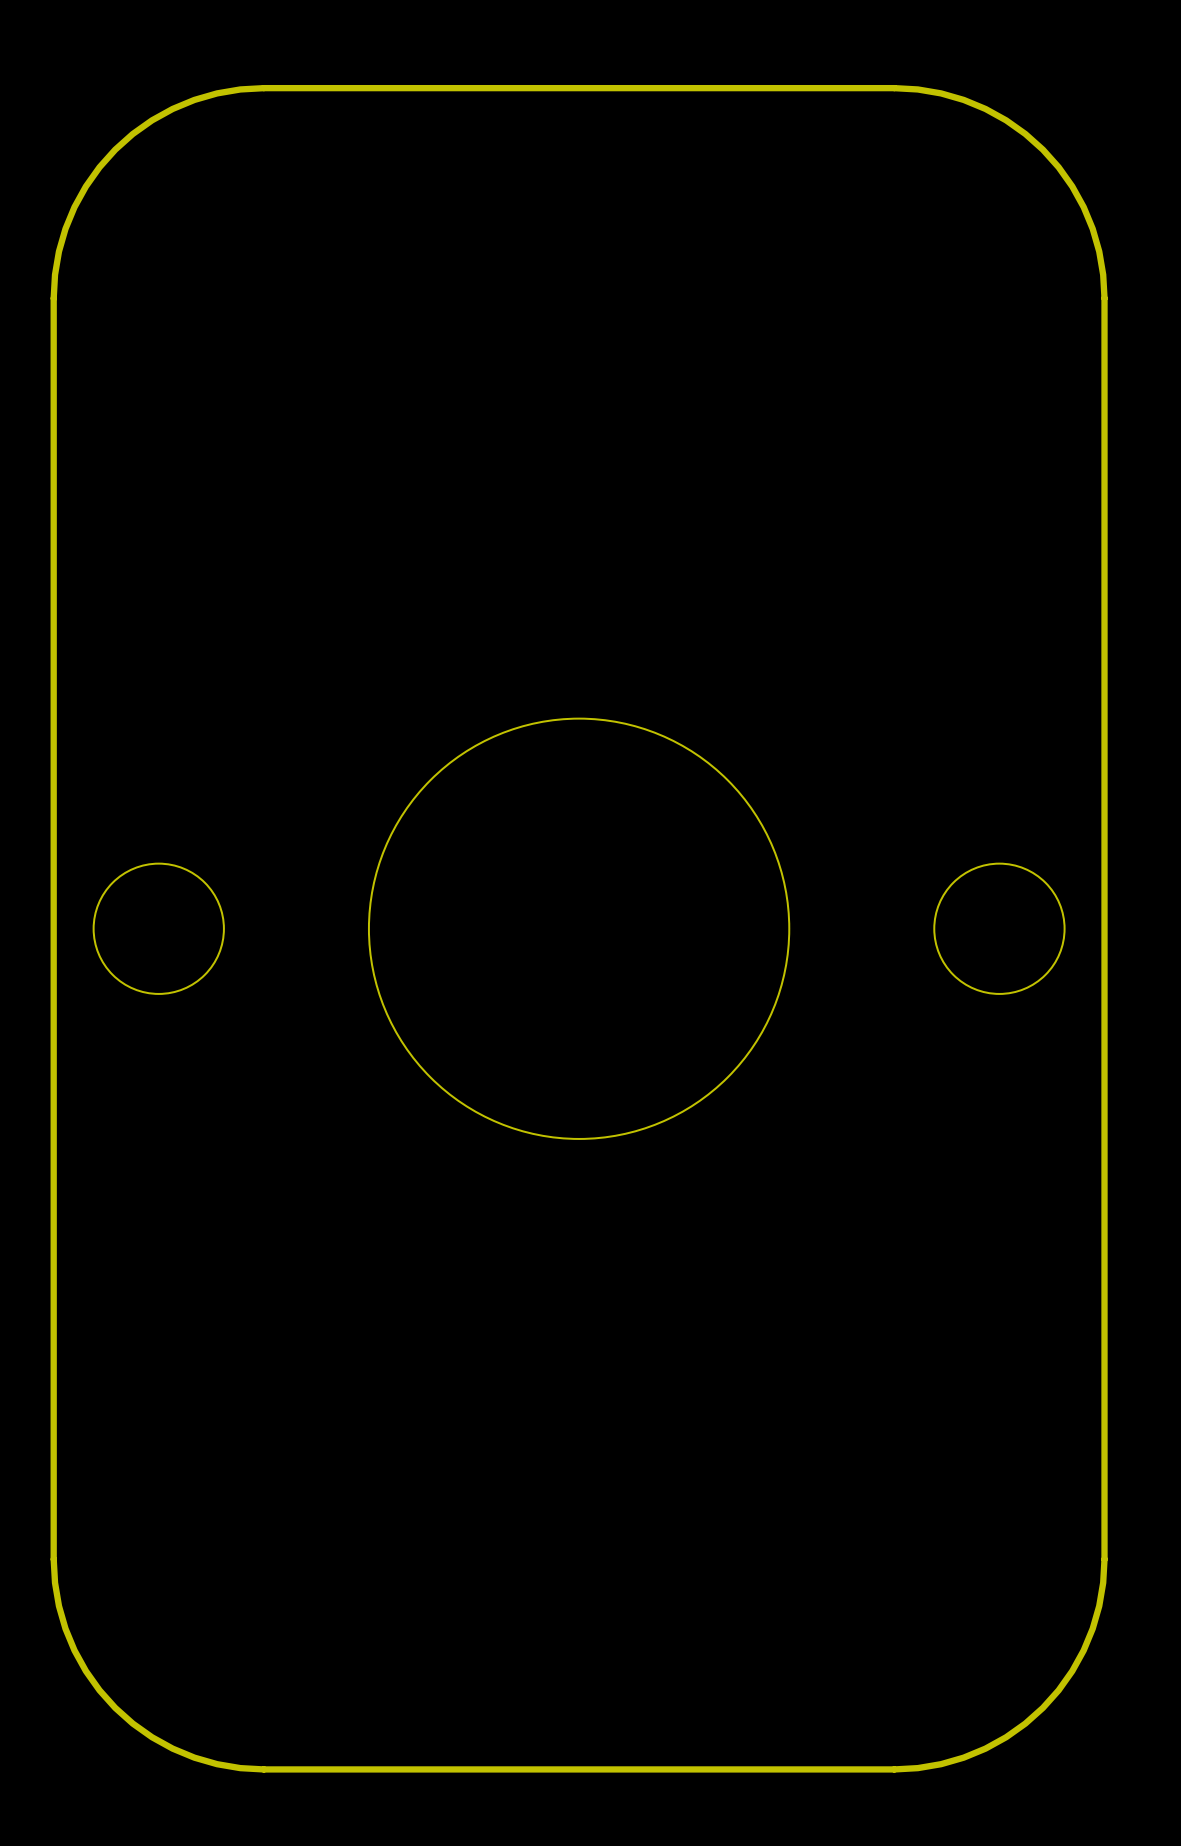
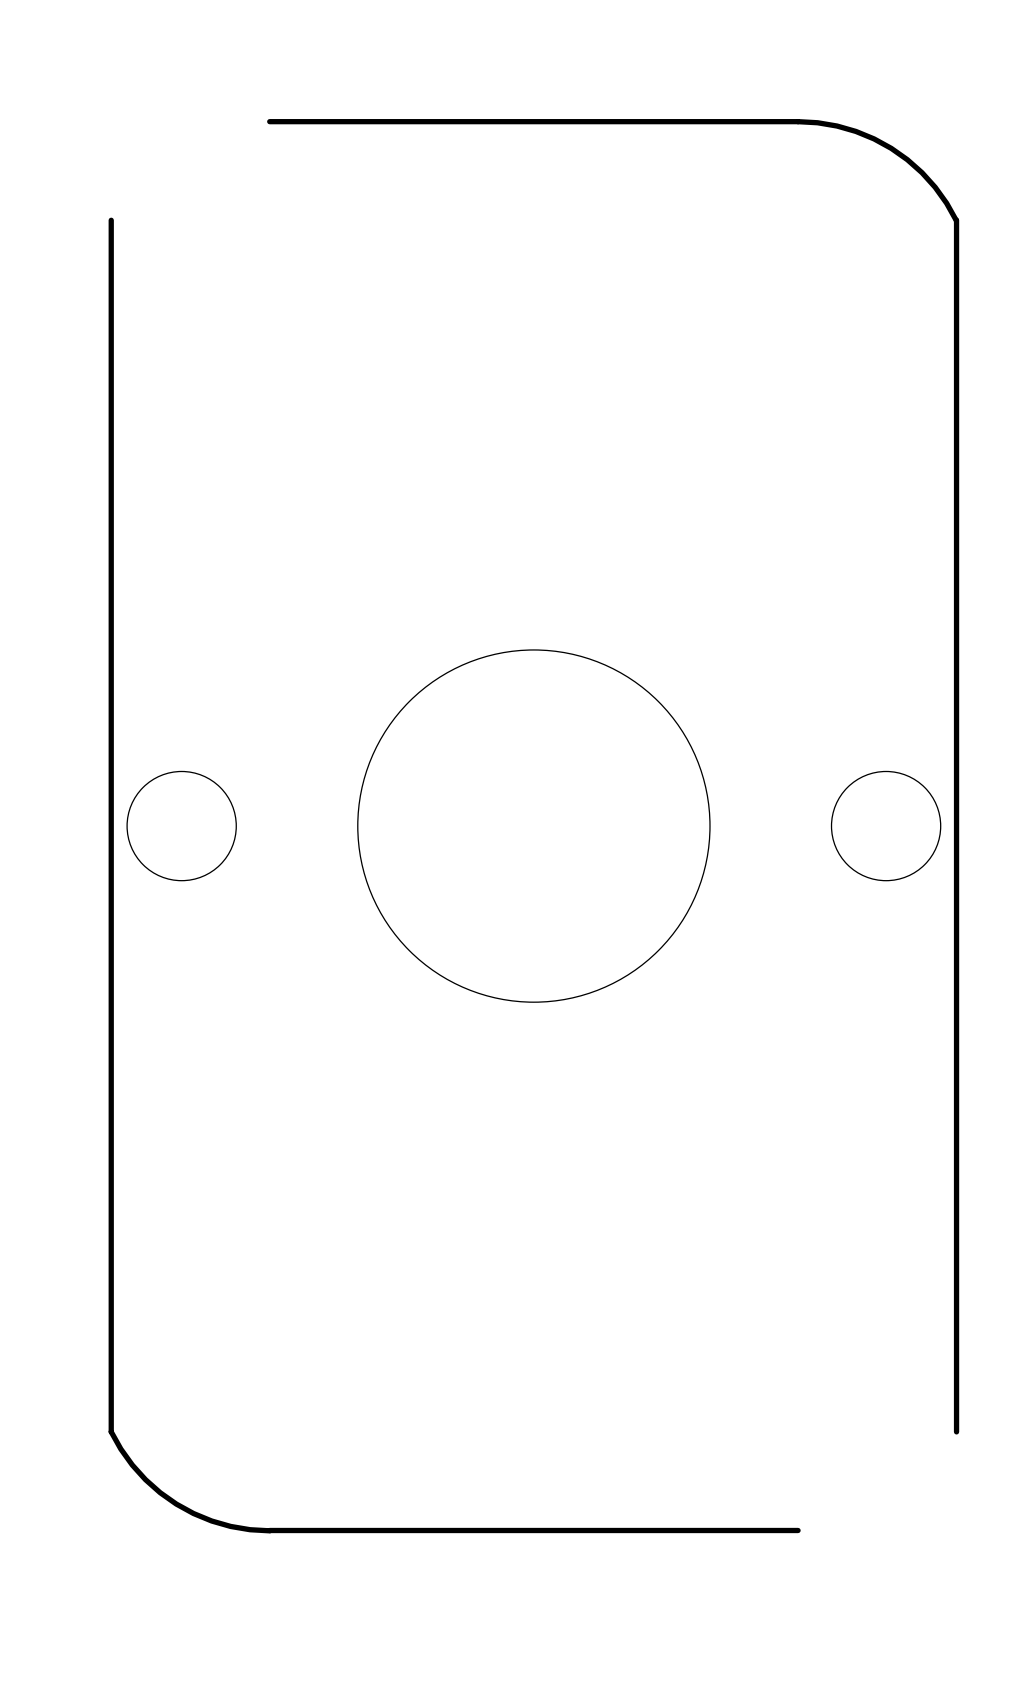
board edge: (263, 88) (240, 89) (194, 99) (152, 120) (115, 149) (85, 186) (65, 228) (55, 274) (53, 298) (55, 1582) (65, 1628) (74, 1650) (85, 1671) (115, 1707) (152, 1737) (194, 1757) (240, 1768) (263, 1769) -> (111, 220) (111, 1431) (132, 1465) (145, 1479) (176, 1504) (211, 1521) (250, 1529) (269, 1530)
board edge: (894, 88) (917, 89) (963, 99) (1006, 120) (1042, 149) (1072, 186) (1092, 228) (1103, 274) (1104, 298) (1103, 1582) (1092, 1628) (1083, 1650) (1072, 1671) (1042, 1707) (1006, 1737) (963, 1757) (917, 1768) (894, 1769) -> (798, 121) (817, 122) (855, 131) (891, 148) (922, 172) (935, 187) (956, 220)
board edge: none -> (956, 220) (956, 1431)

